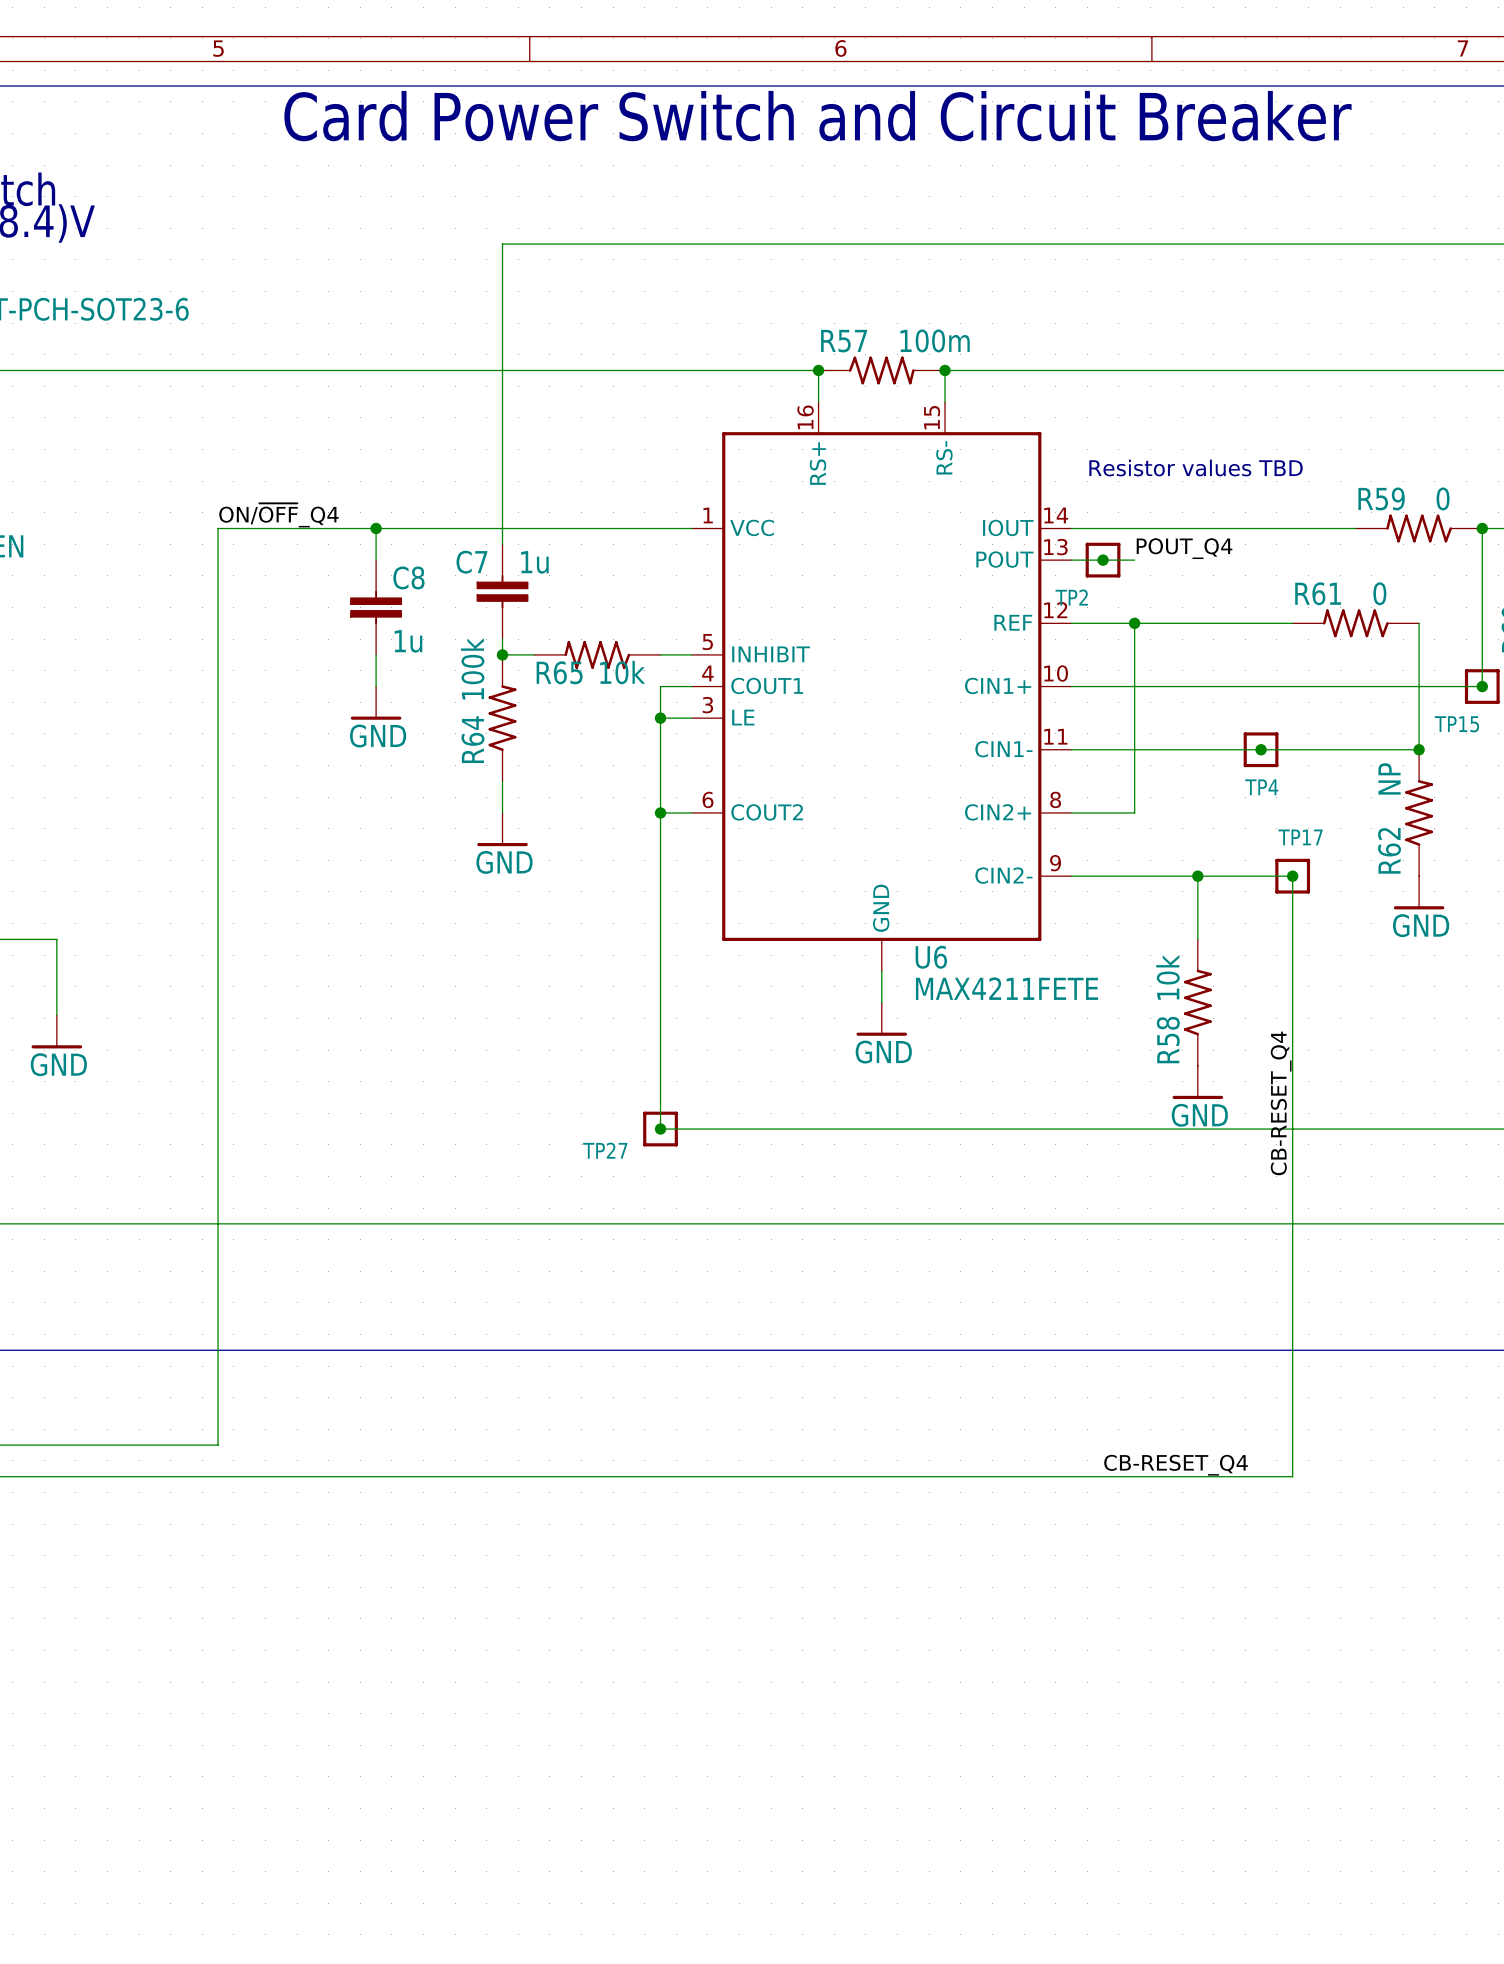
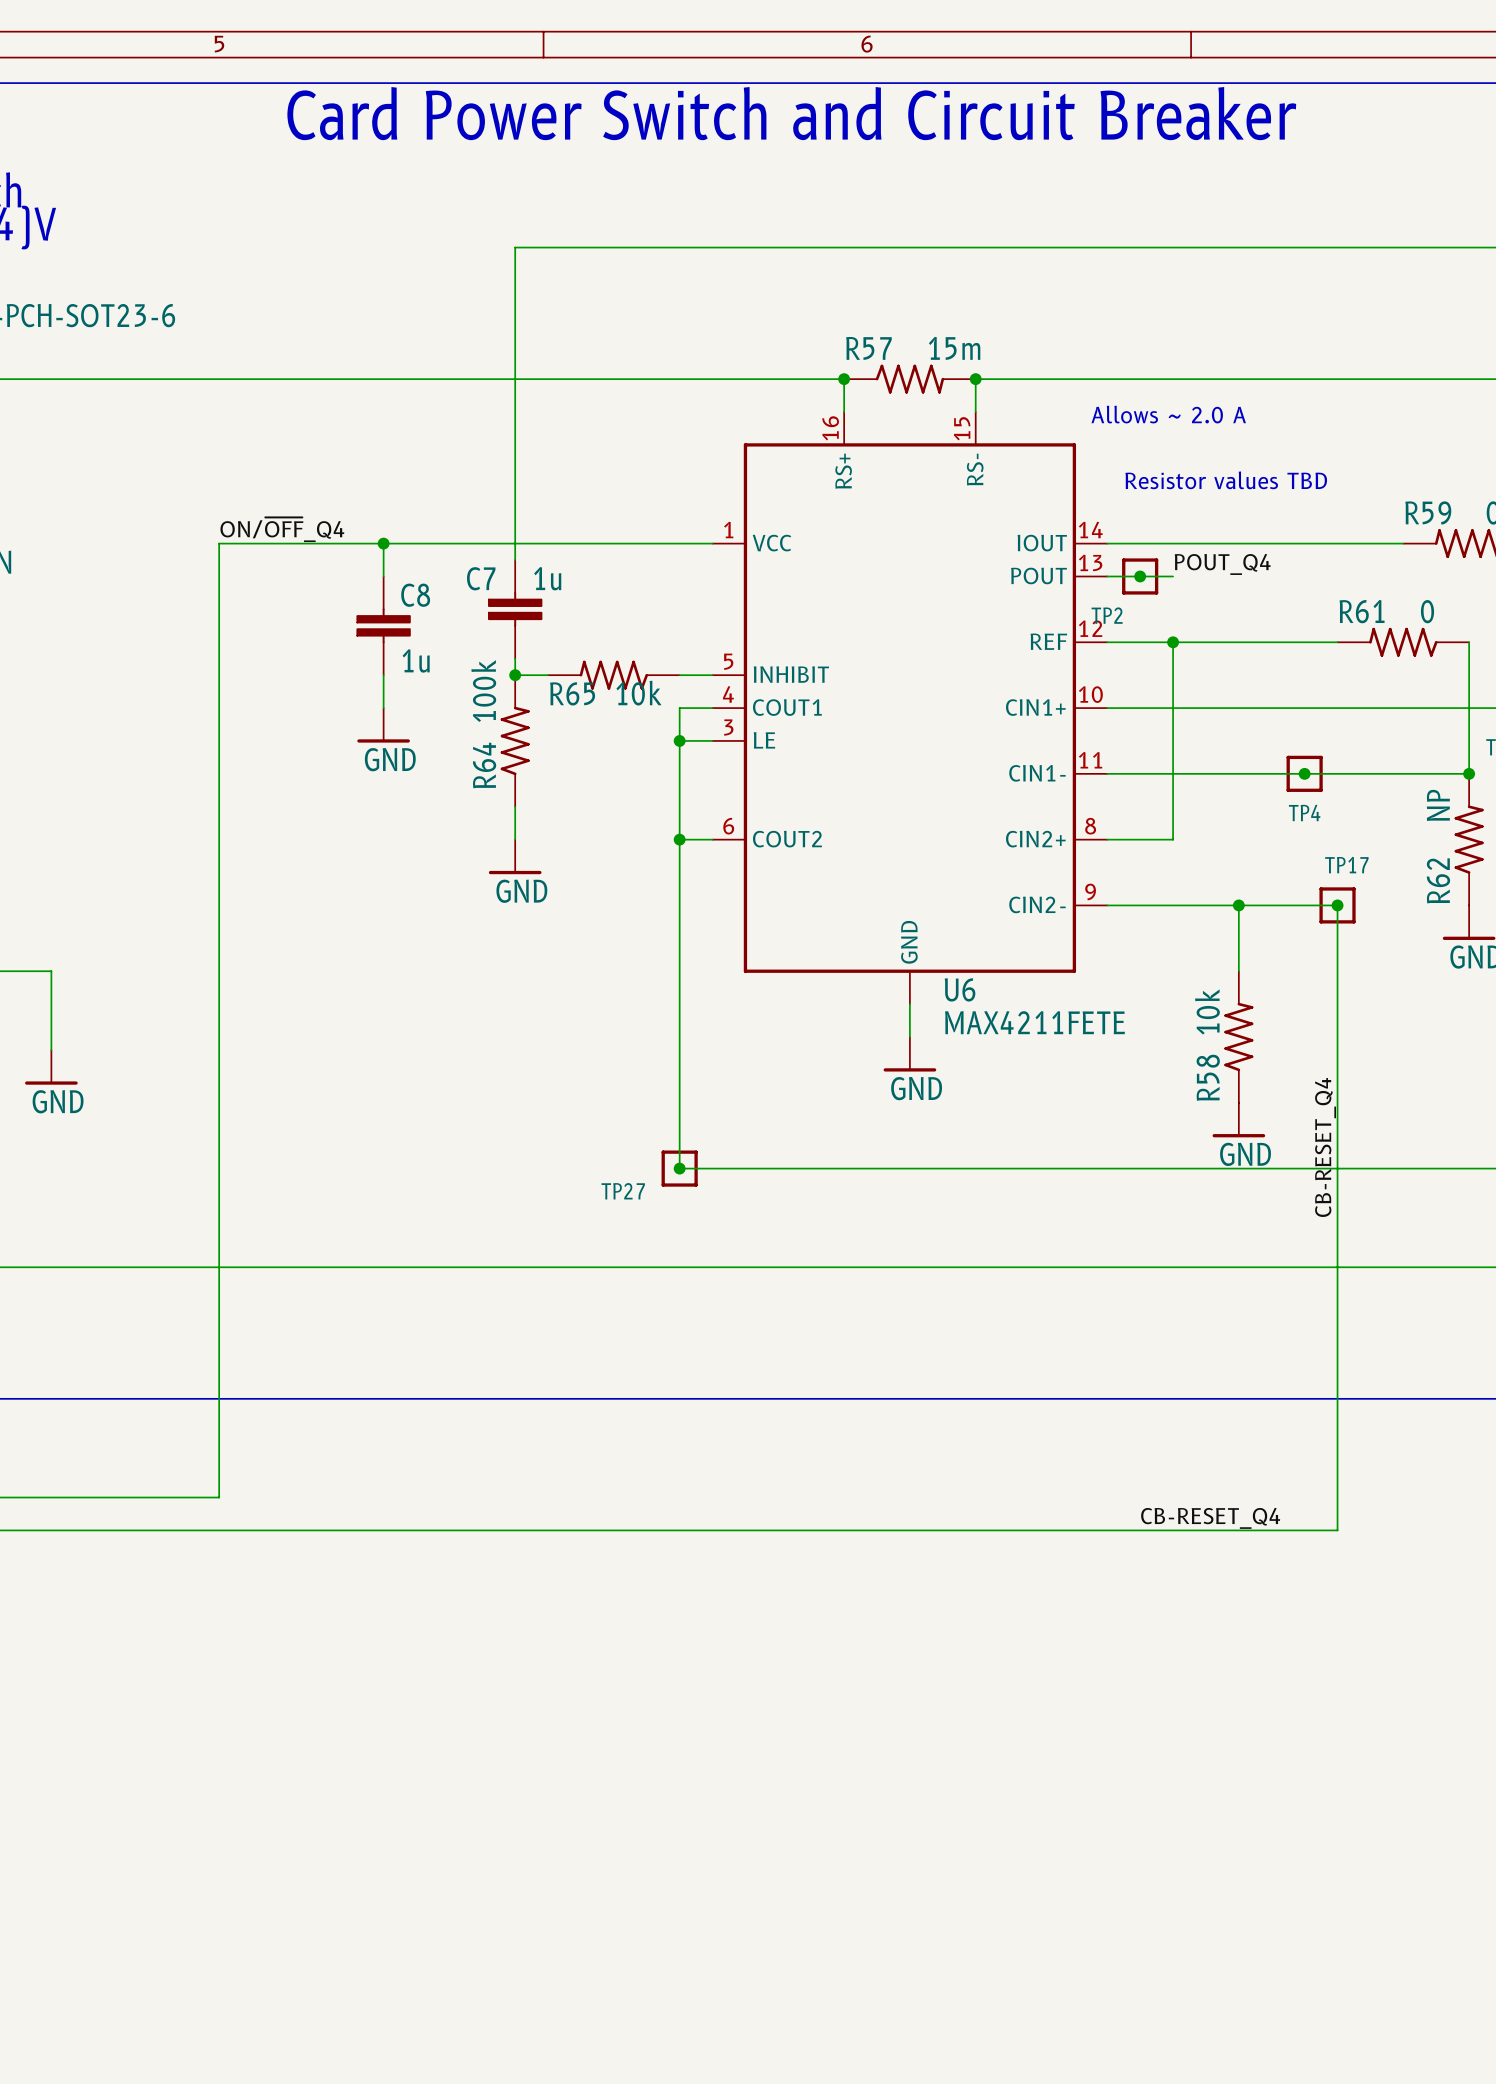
R57 value: 100m (935, 340) -> 15m (954, 348)
text: none -> Allows ~ 2.0 A (1168, 414)

